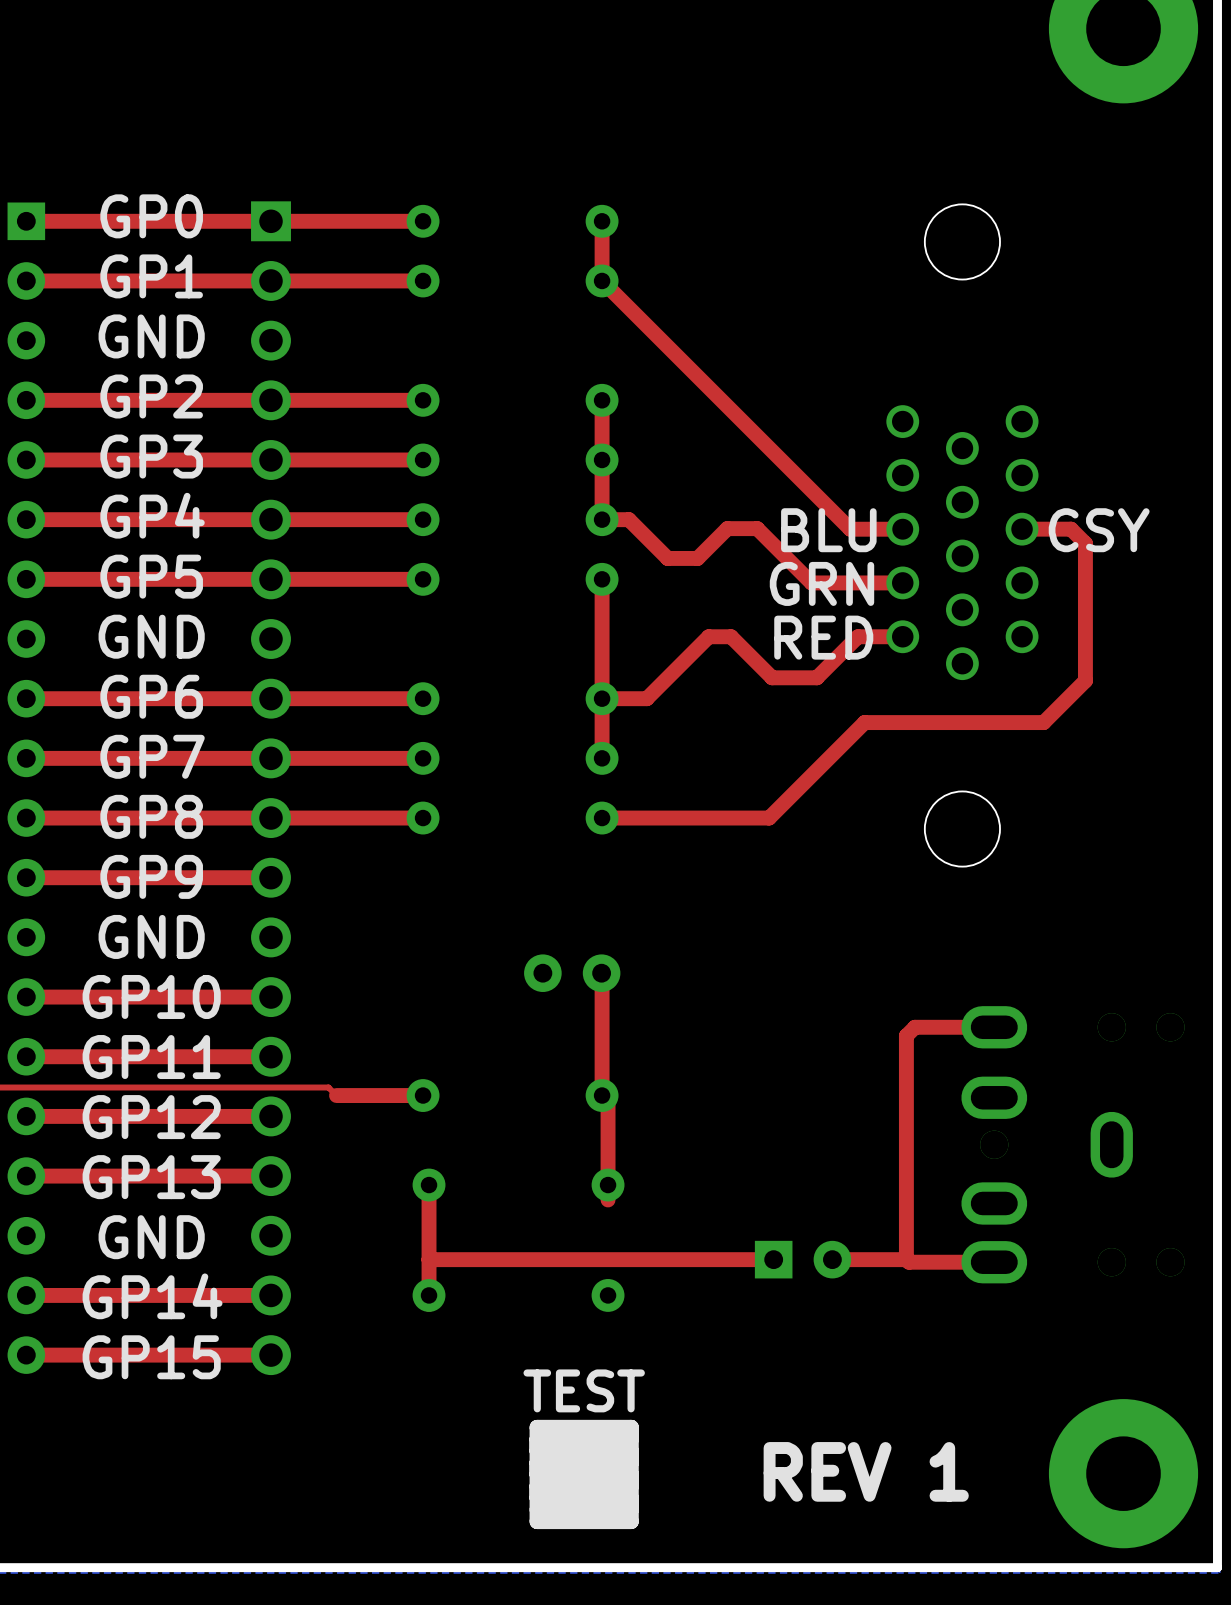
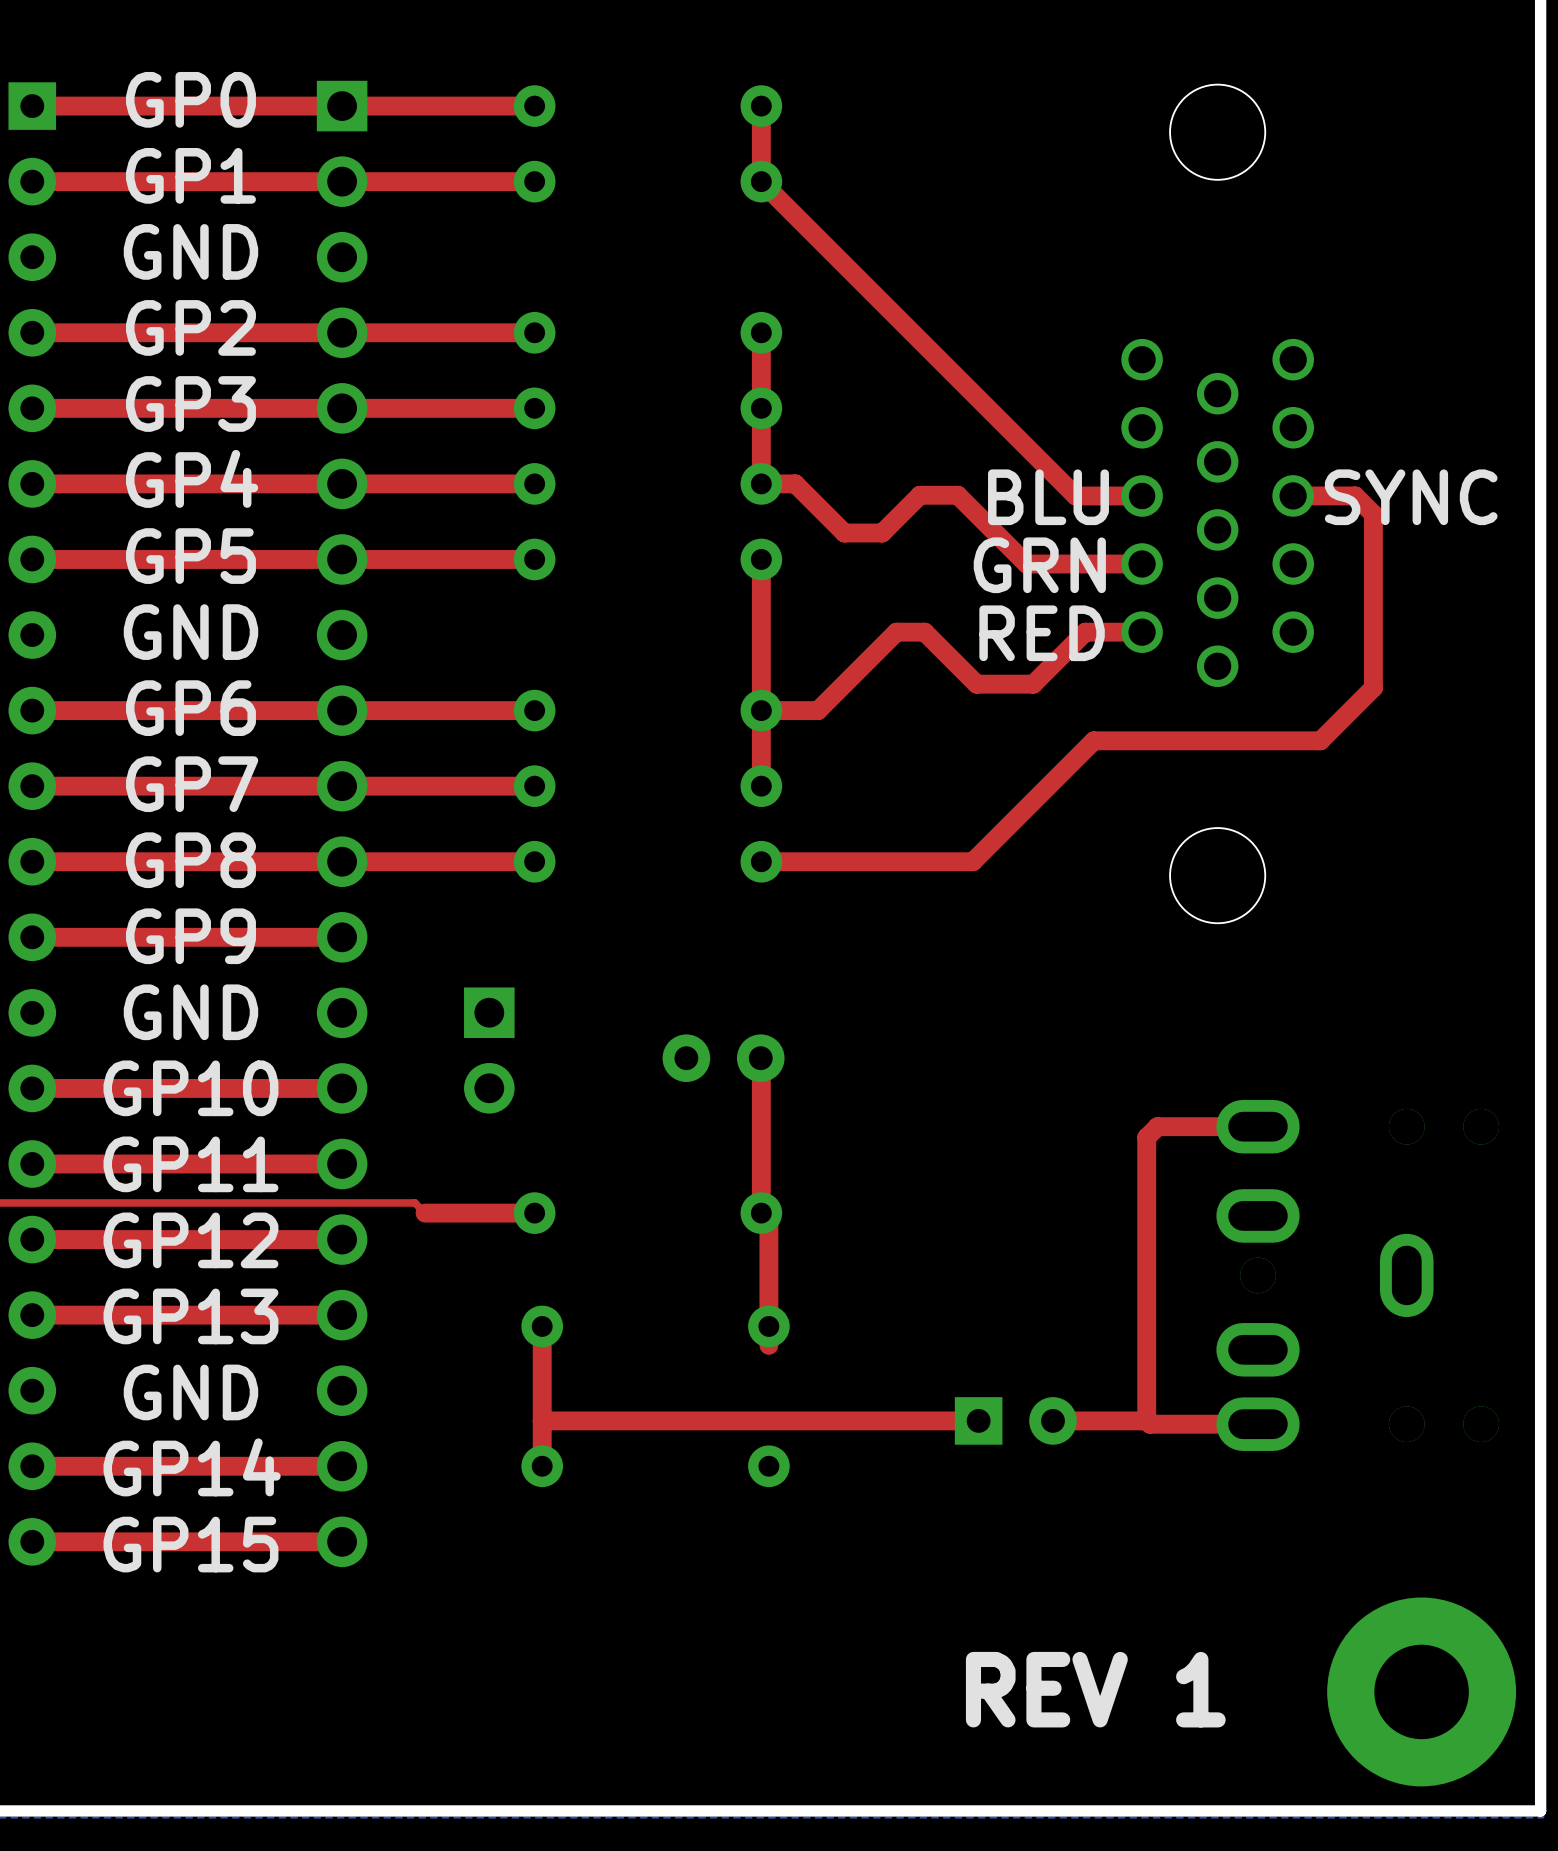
text: CSY (1099, 530) -> SYNC (1411, 497)
part: none -> (489, 1050)
TEST: (584, 1474) -> none

